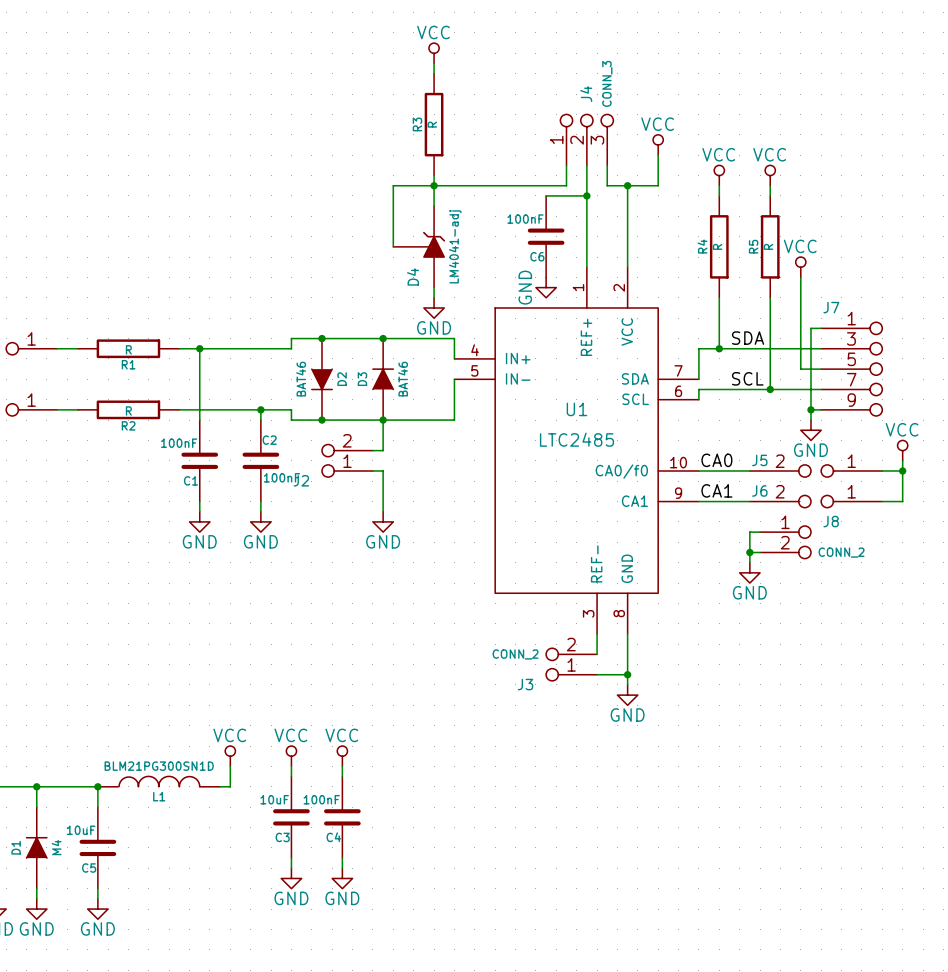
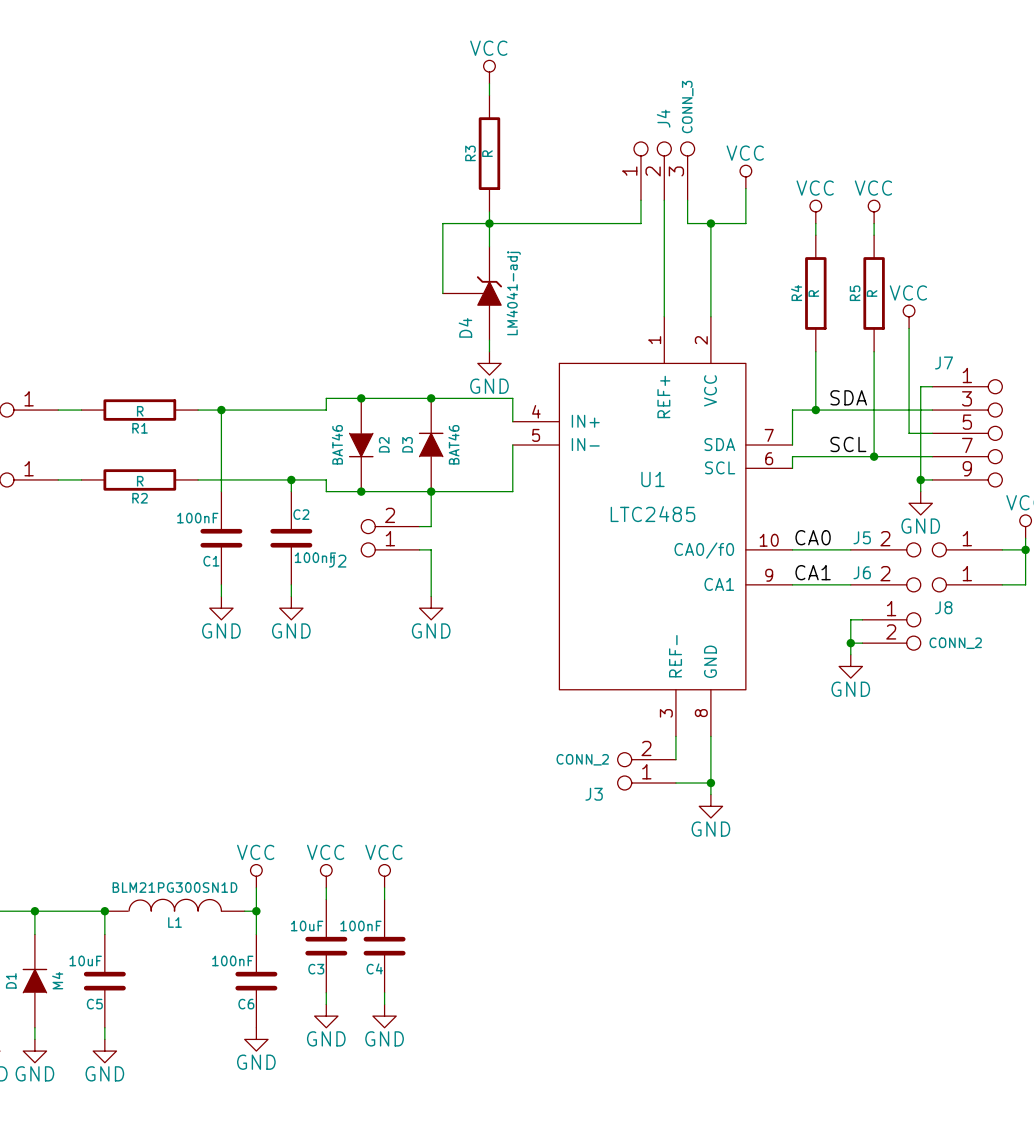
wire: (546, 195) (586, 195) -> none
junction: (586, 195) -> none
C6 position: (546, 236) -> (256, 981)
power symbol: GND (546, 287) -> none
wire: none -> (256, 911) (256, 934)
junction: none -> (256, 911)
power symbol: none -> GND (256, 1039)

